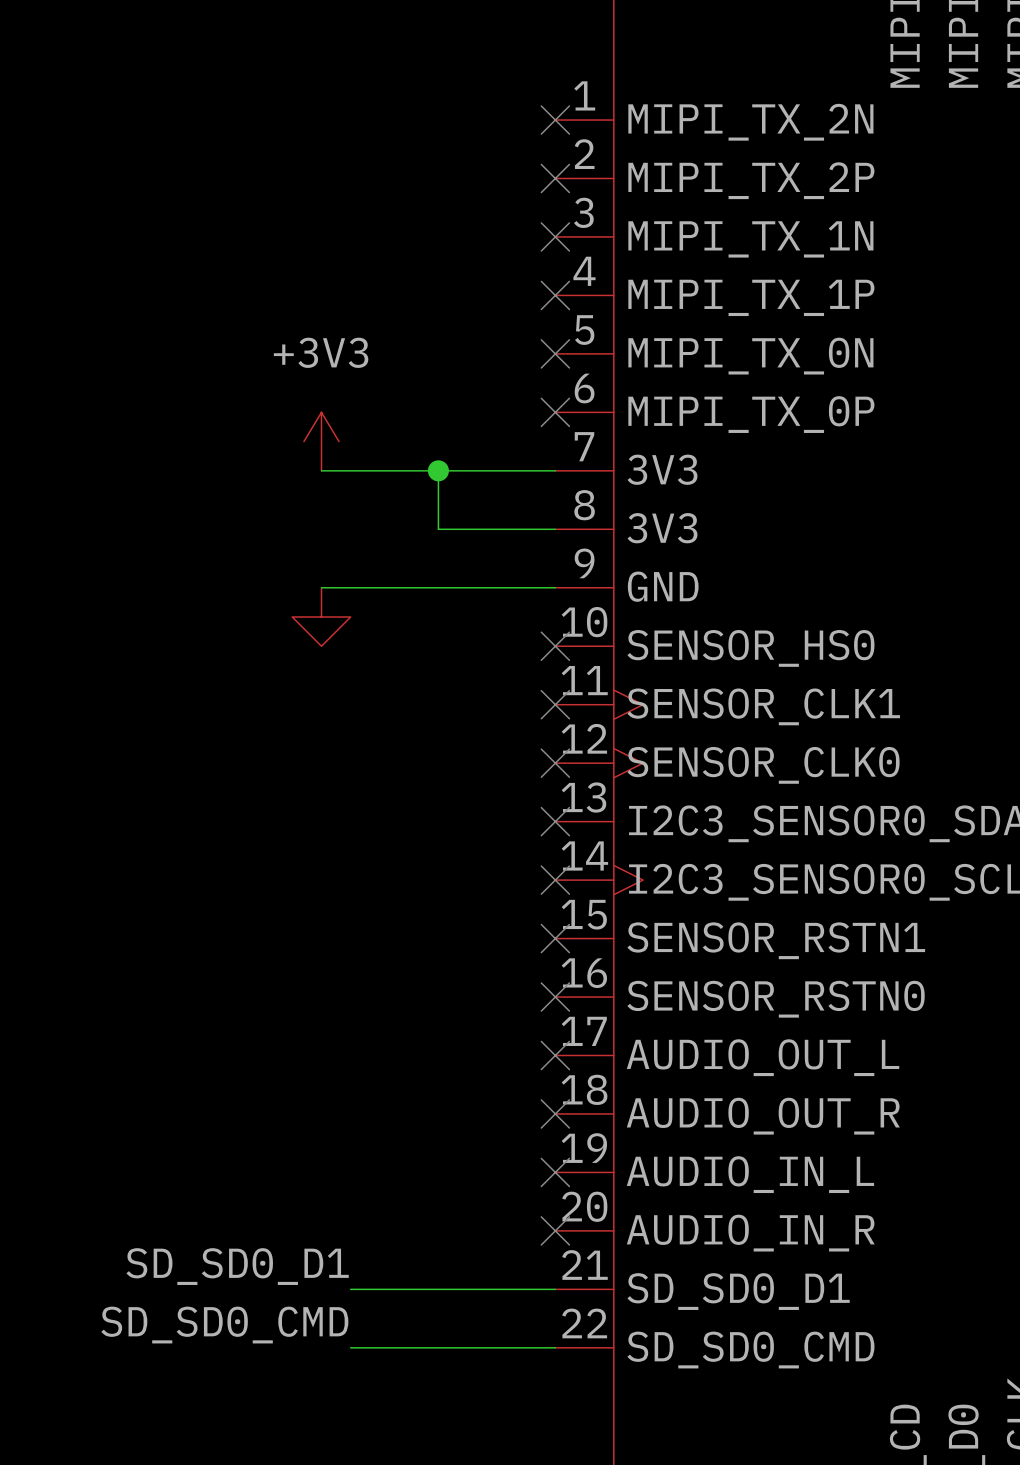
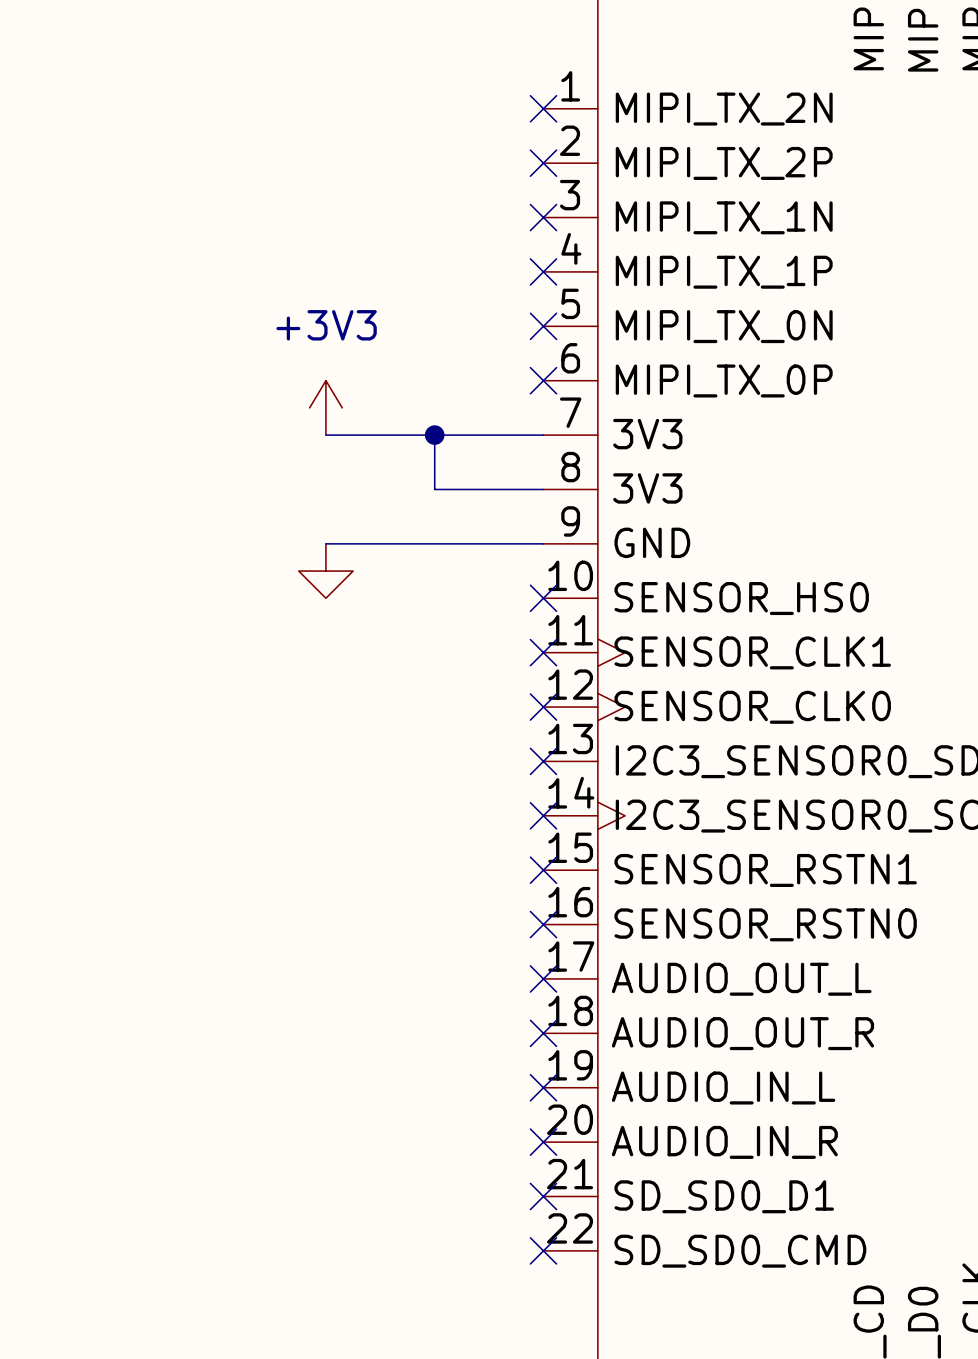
label: SD_SD0_D1 (237, 1266) -> none
wire: (350, 1289) (555, 1289) -> none
no-connect mark: none -> (543, 1196)
label: SD_SD0_CMD (224, 1325) -> none
wire: (350, 1347) (555, 1347) -> none
no-connect mark: none -> (543, 1250)

